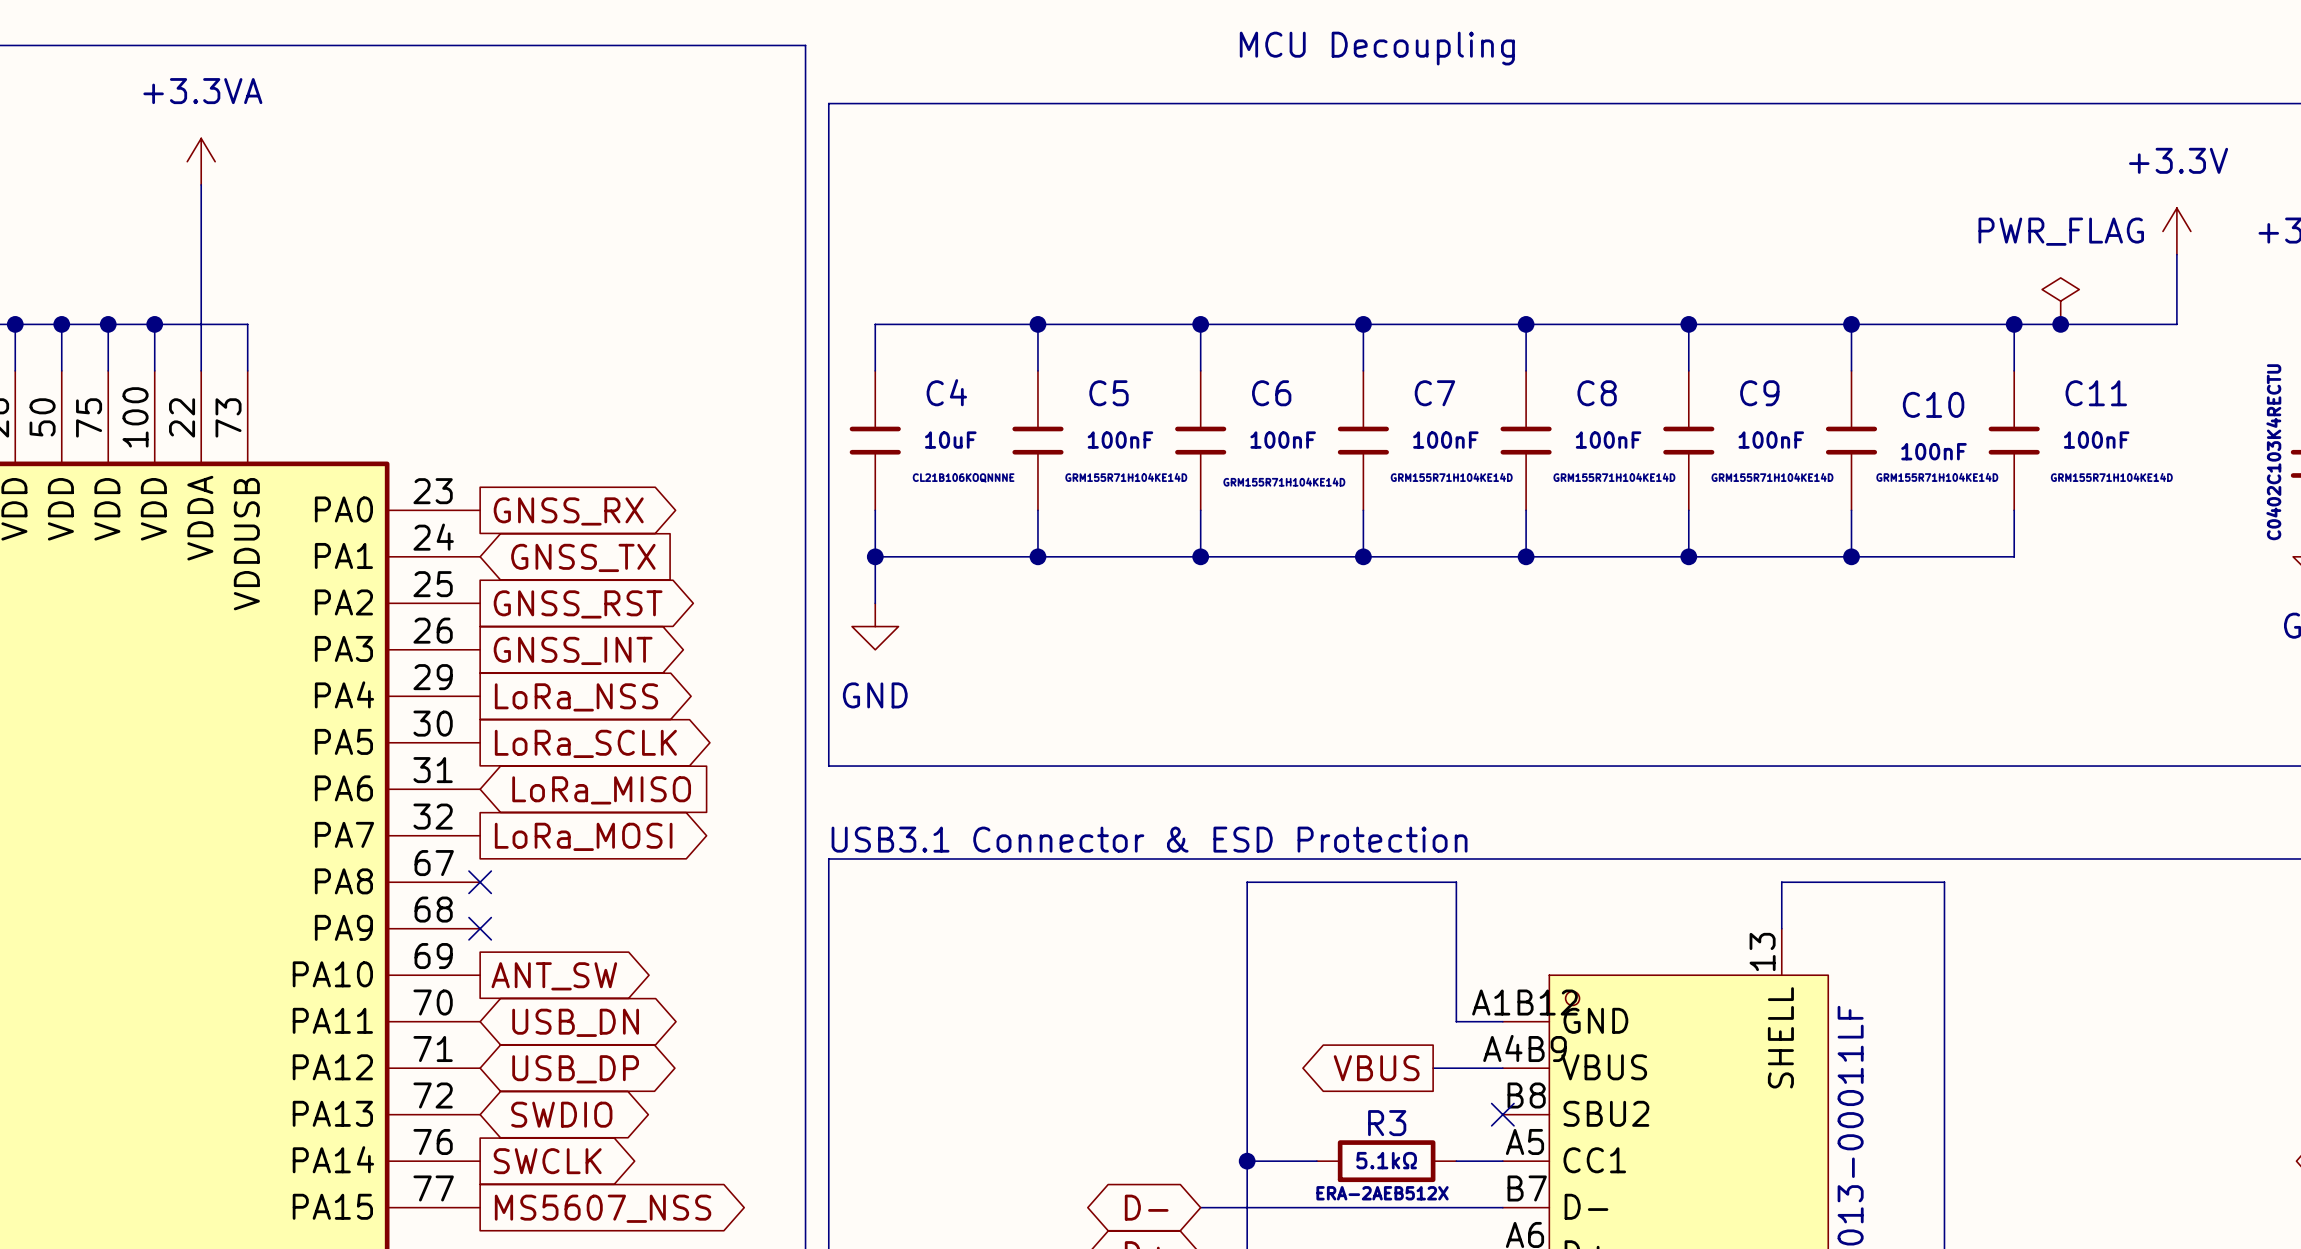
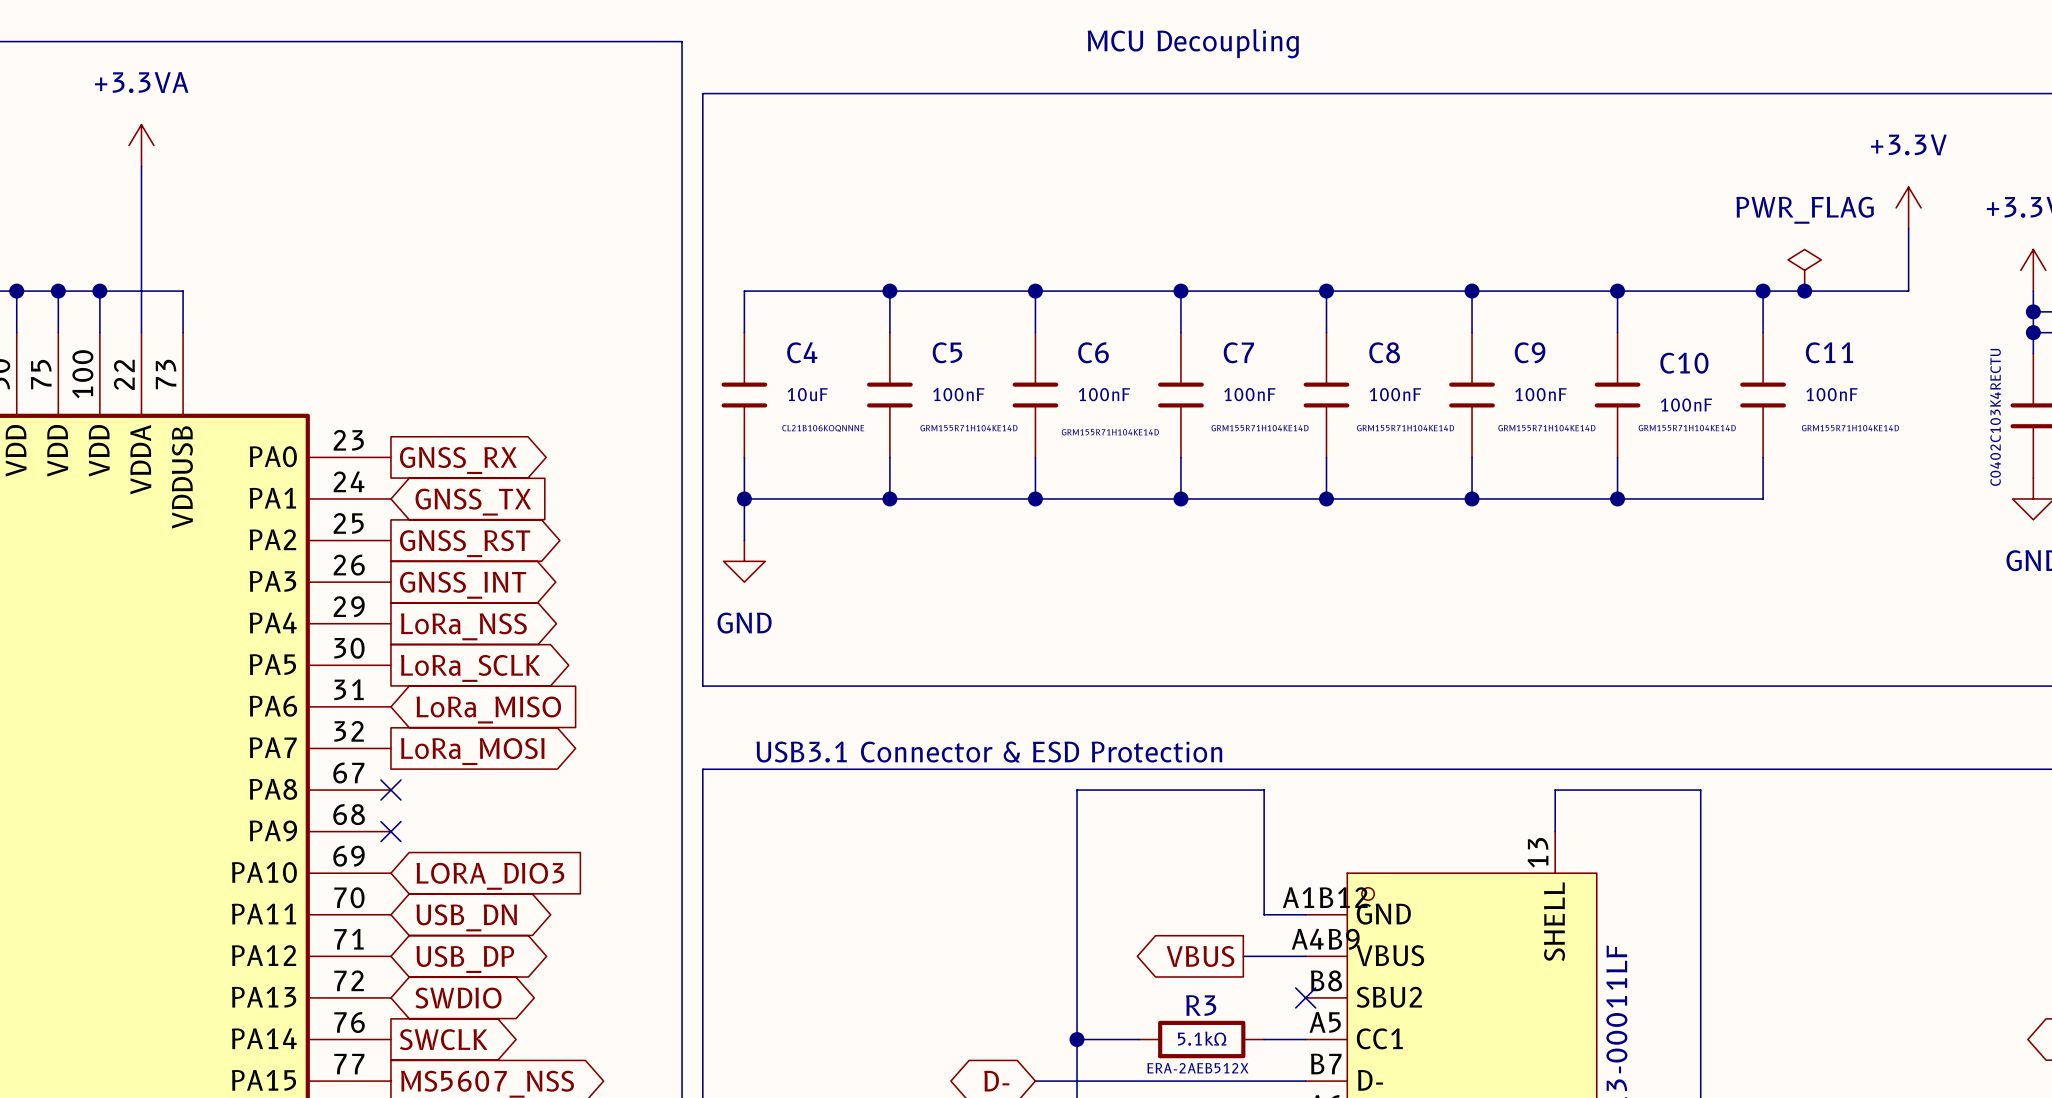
global label shape: output (554, 976) -> input (490, 876)
global label: ANT_SW (554, 976) -> LORA_DIO3 (490, 876)

